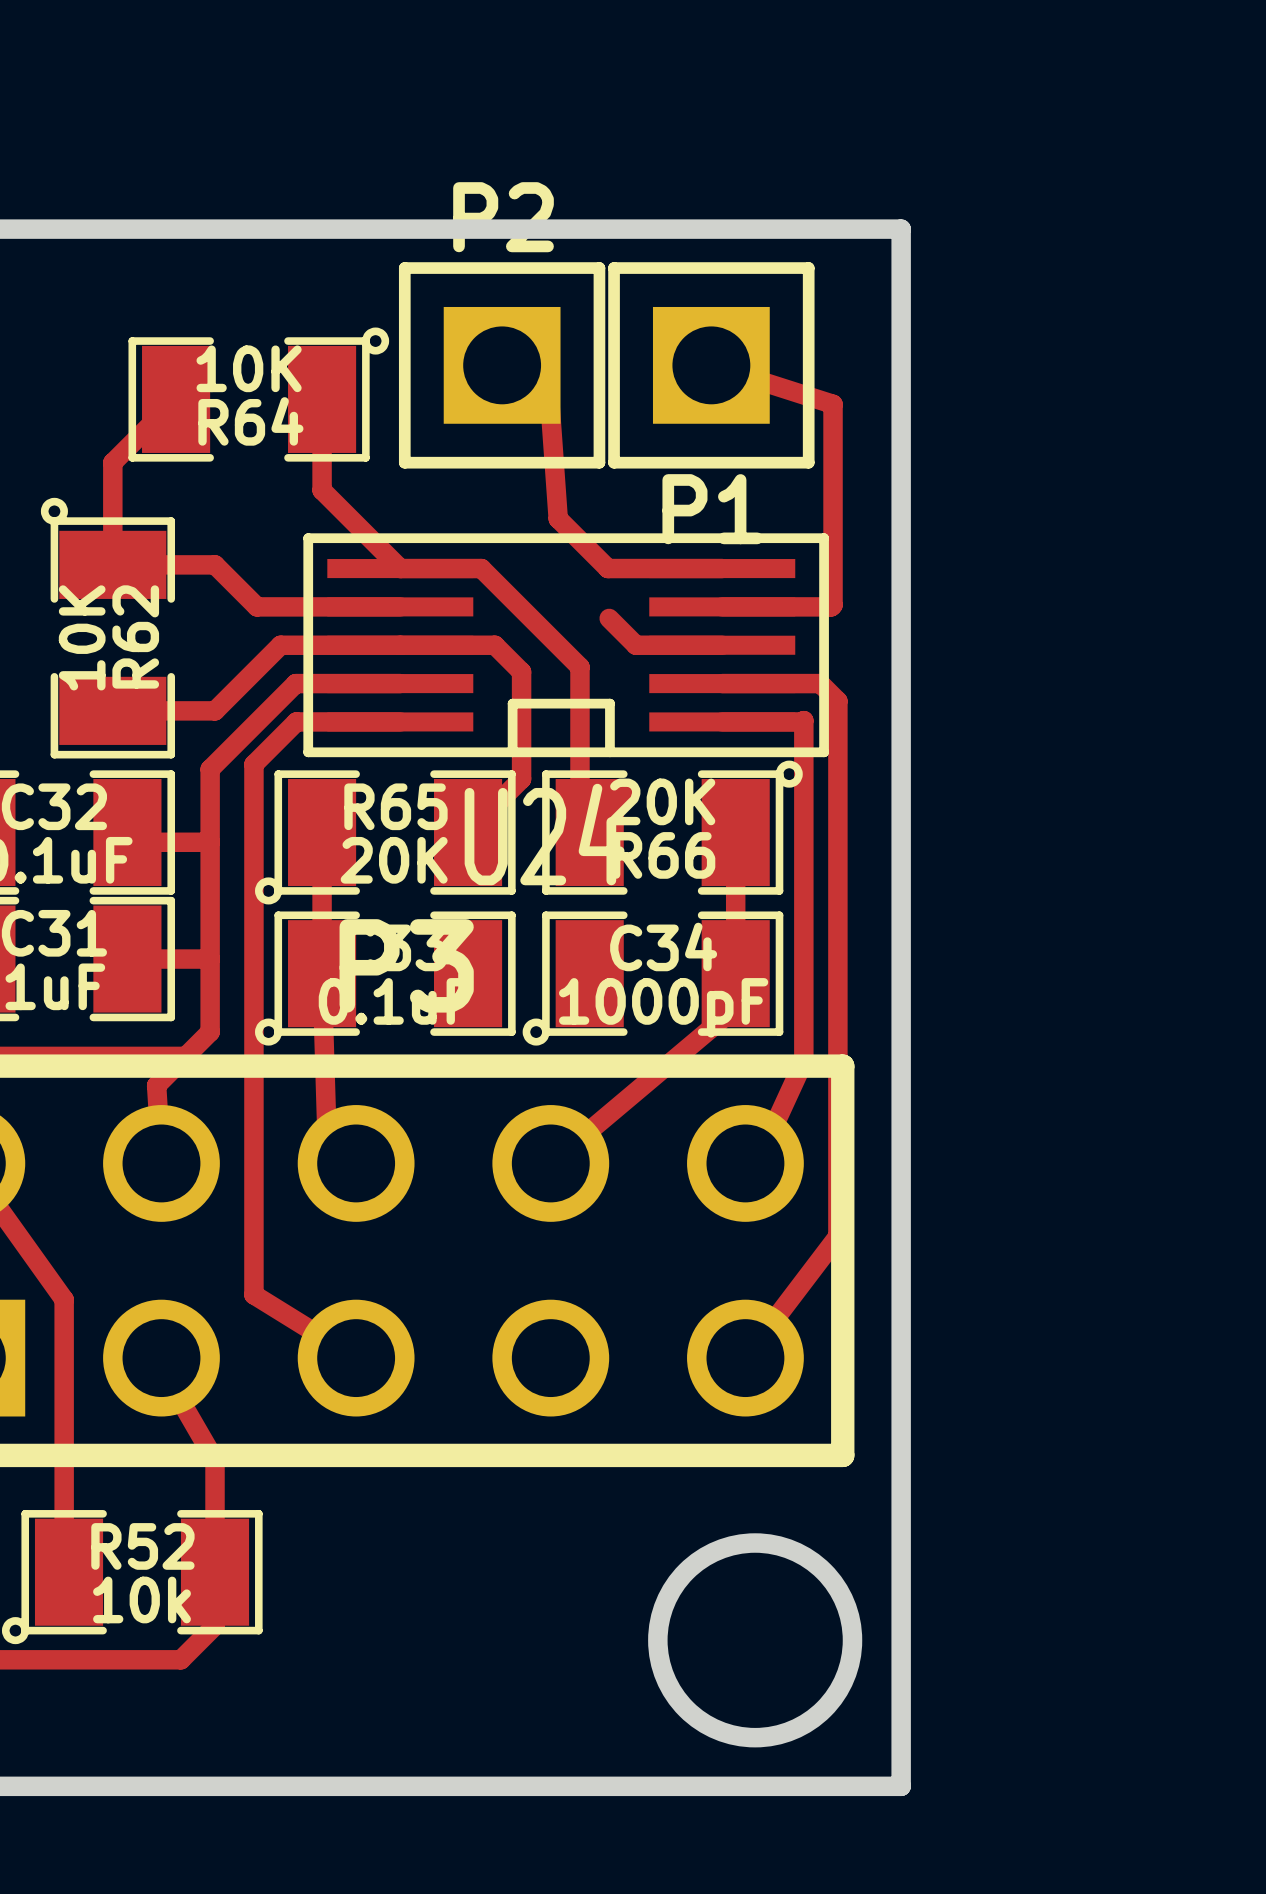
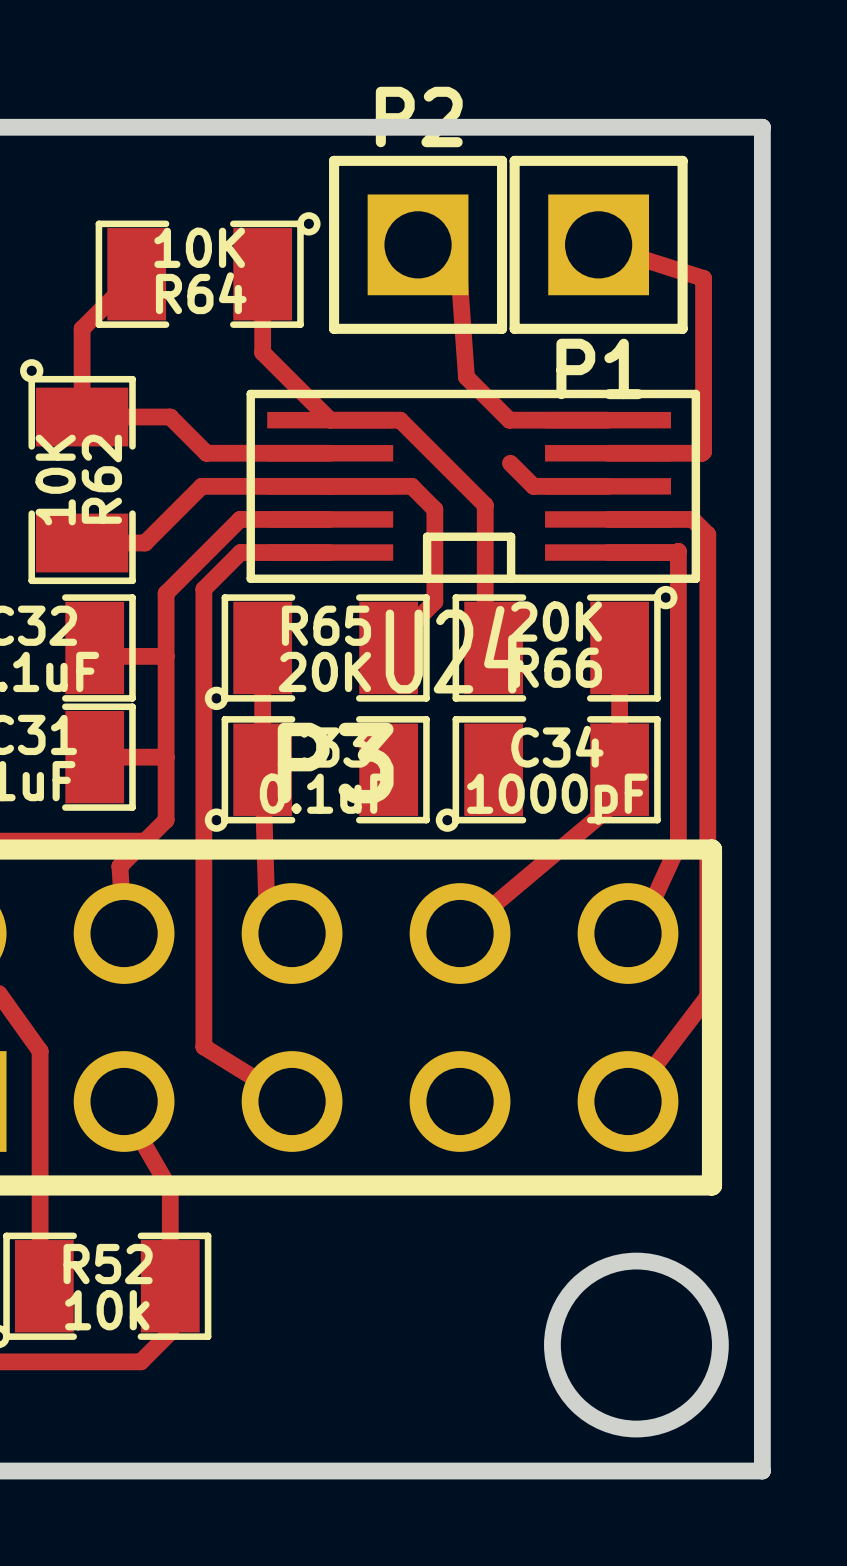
track: (280, 645) (215, 710) (185, 710) -> (226, 486) (201, 486) (145, 543)

